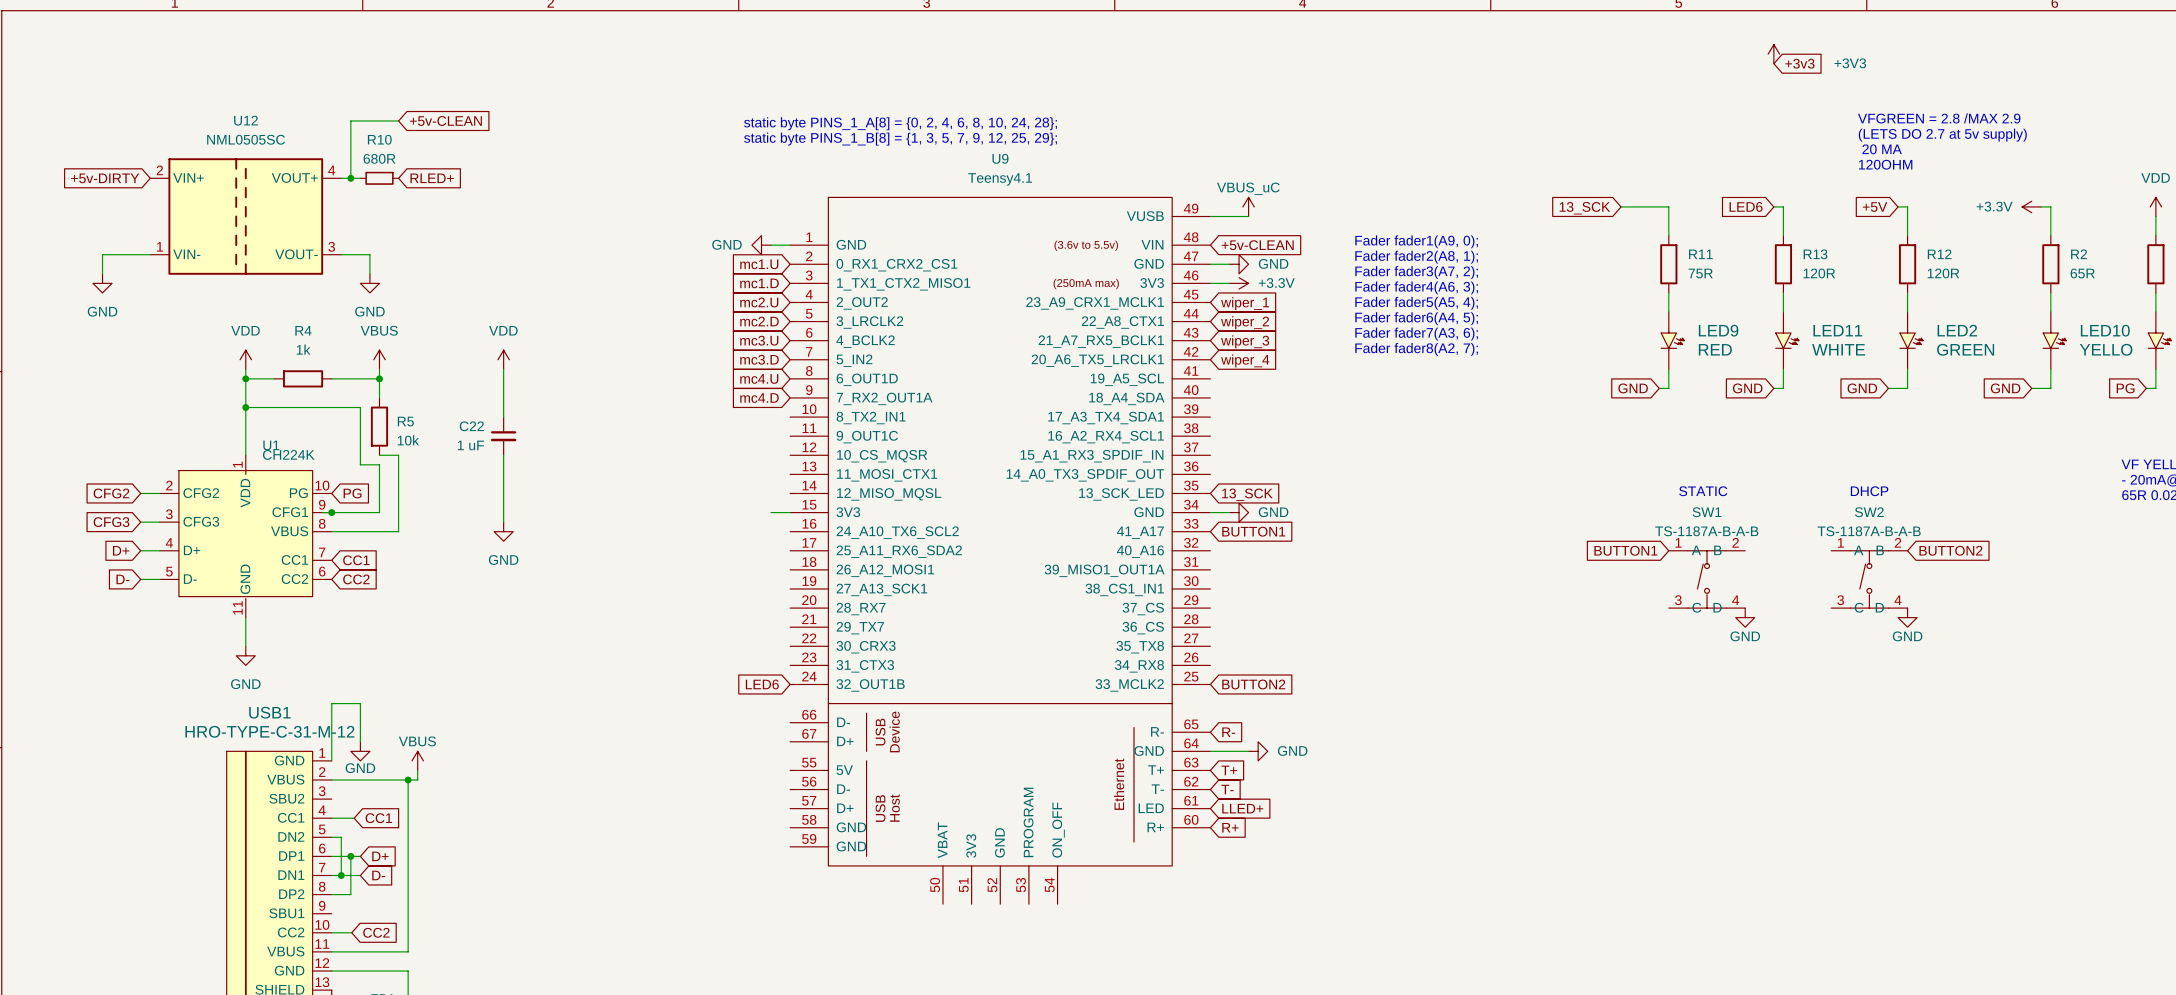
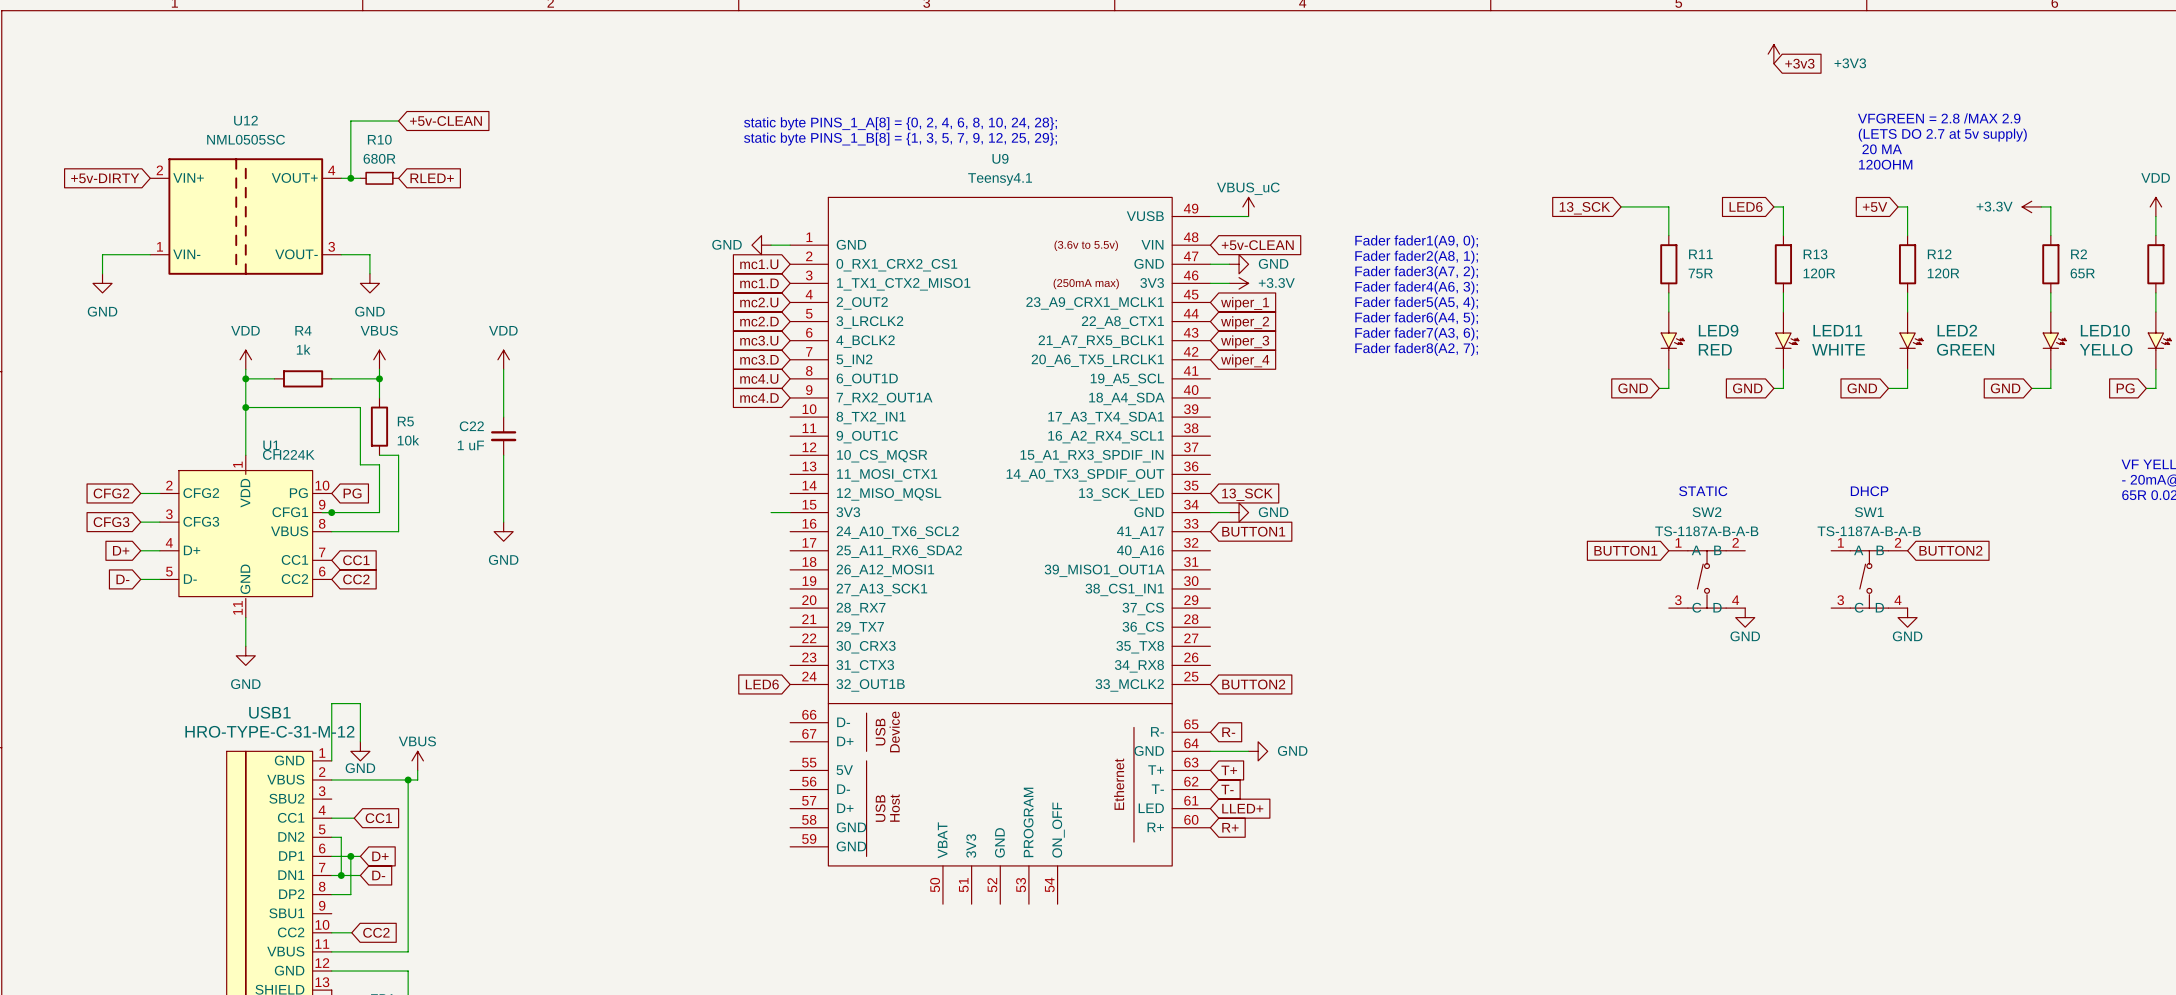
SW1 name: SW1 (1706, 512) -> SW2 (1706, 512)
SW2 name: SW2 (1869, 512) -> SW1 (1869, 512)

